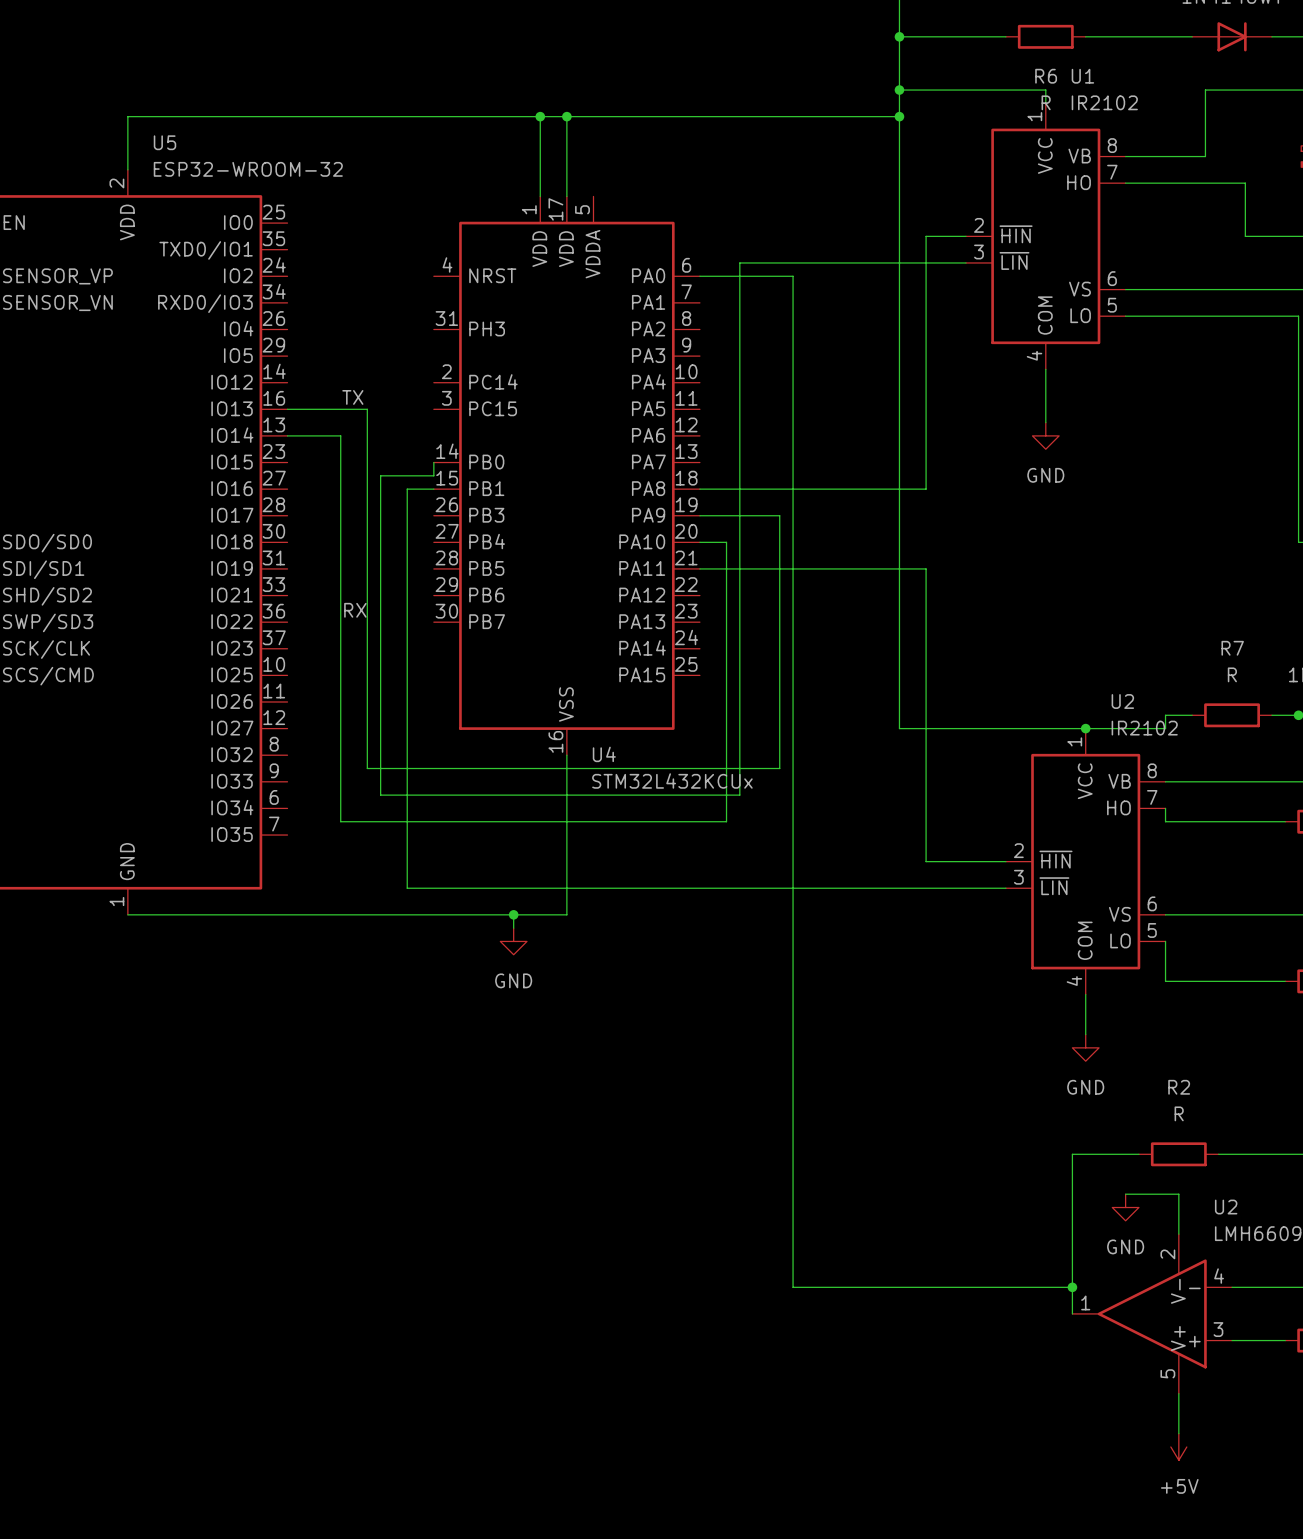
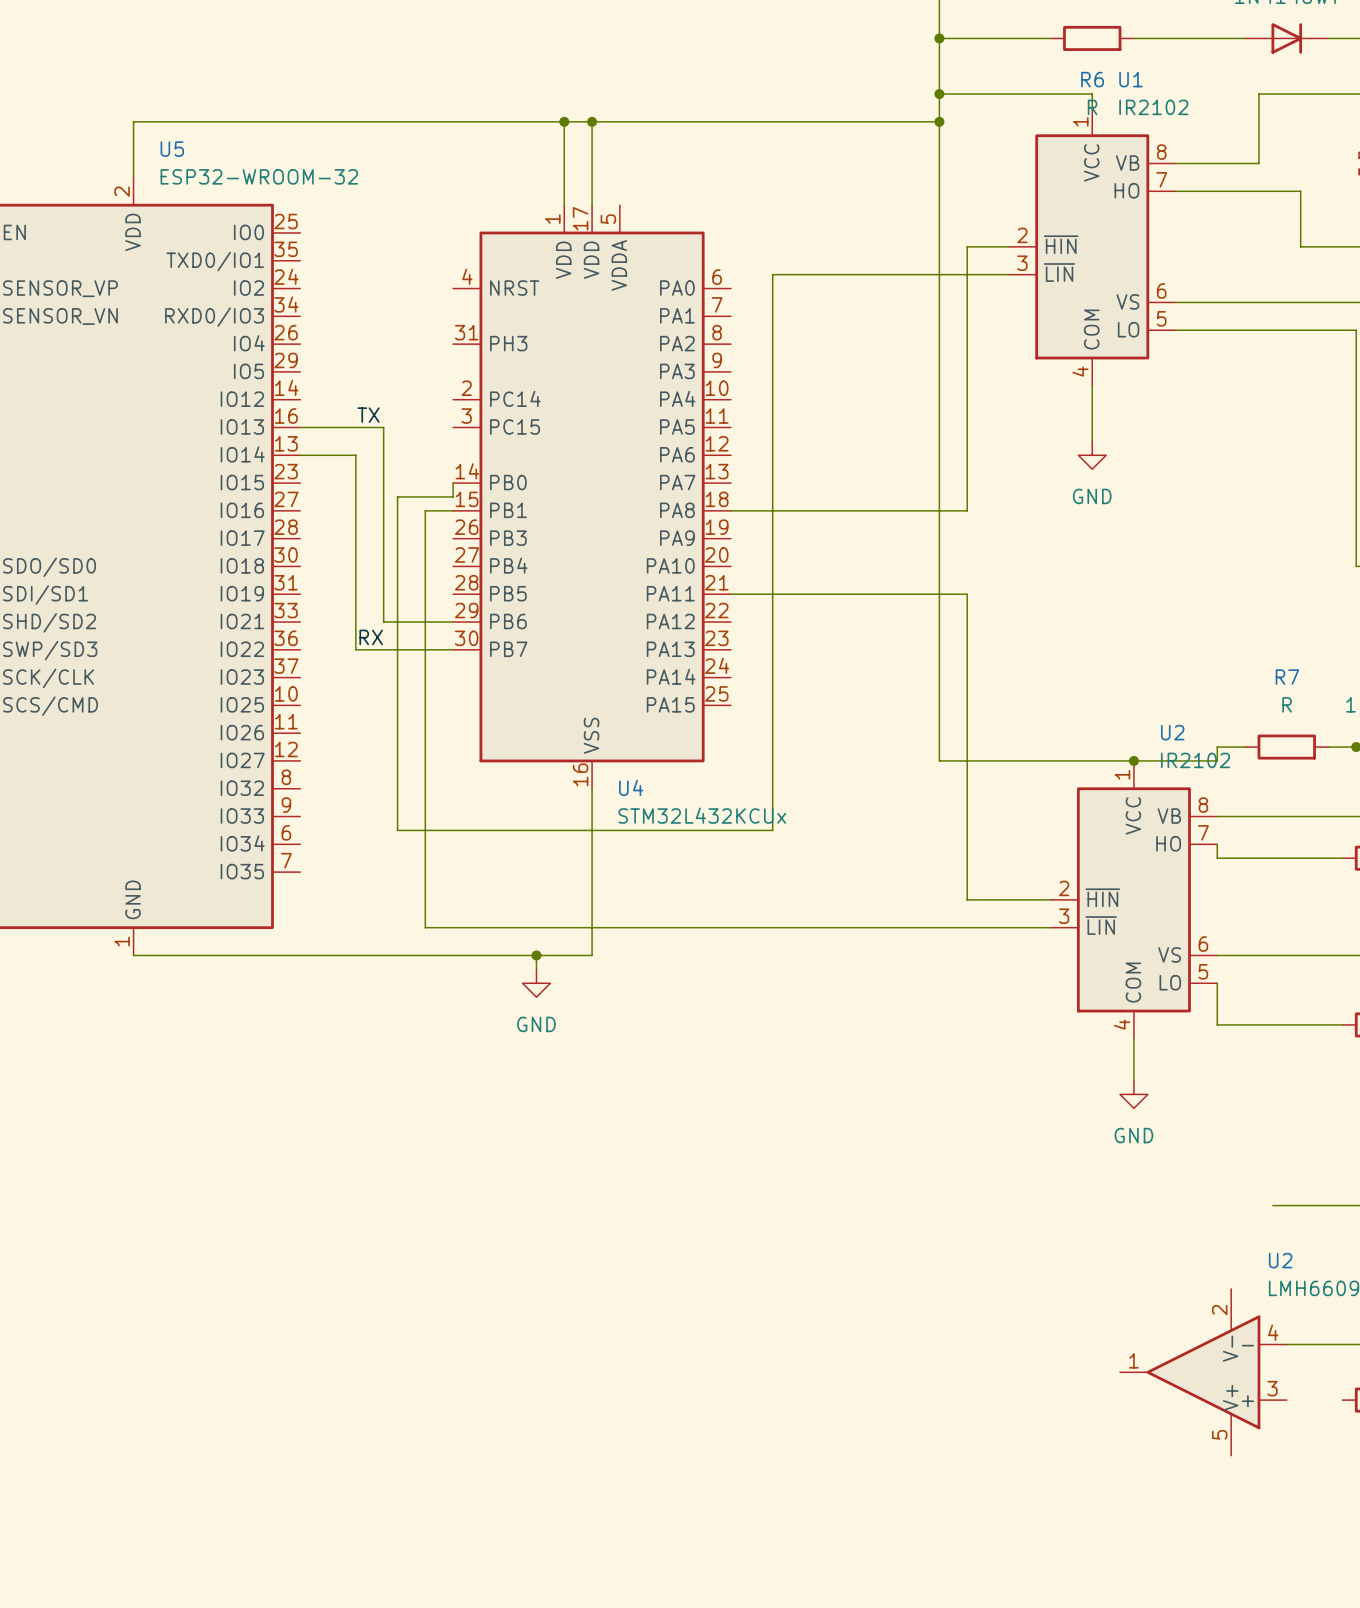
wire: (699, 276) (793, 276) (793, 1287) (1072, 1287) -> none
wire: (699, 515) (779, 515) (779, 768) (367, 768) (367, 595) -> (453, 622) (383, 622)
wire: (699, 542) (726, 542) (726, 821) (340, 821) (340, 622) -> (453, 649) (355, 649)
wire: (1138, 1154) (1072, 1154) (1072, 1313) -> none
R2: R (1178, 1154) -> none
wire: (1125, 1194) (1178, 1194) (1178, 1234) -> none
power symbol: GND (1125, 1207) -> none
junction: (1072, 1287) -> none
wire: (1232, 1340) (1285, 1340) -> none
wire: (1178, 1393) (1178, 1433) -> none
power symbol: +5V (1178, 1446) -> none

